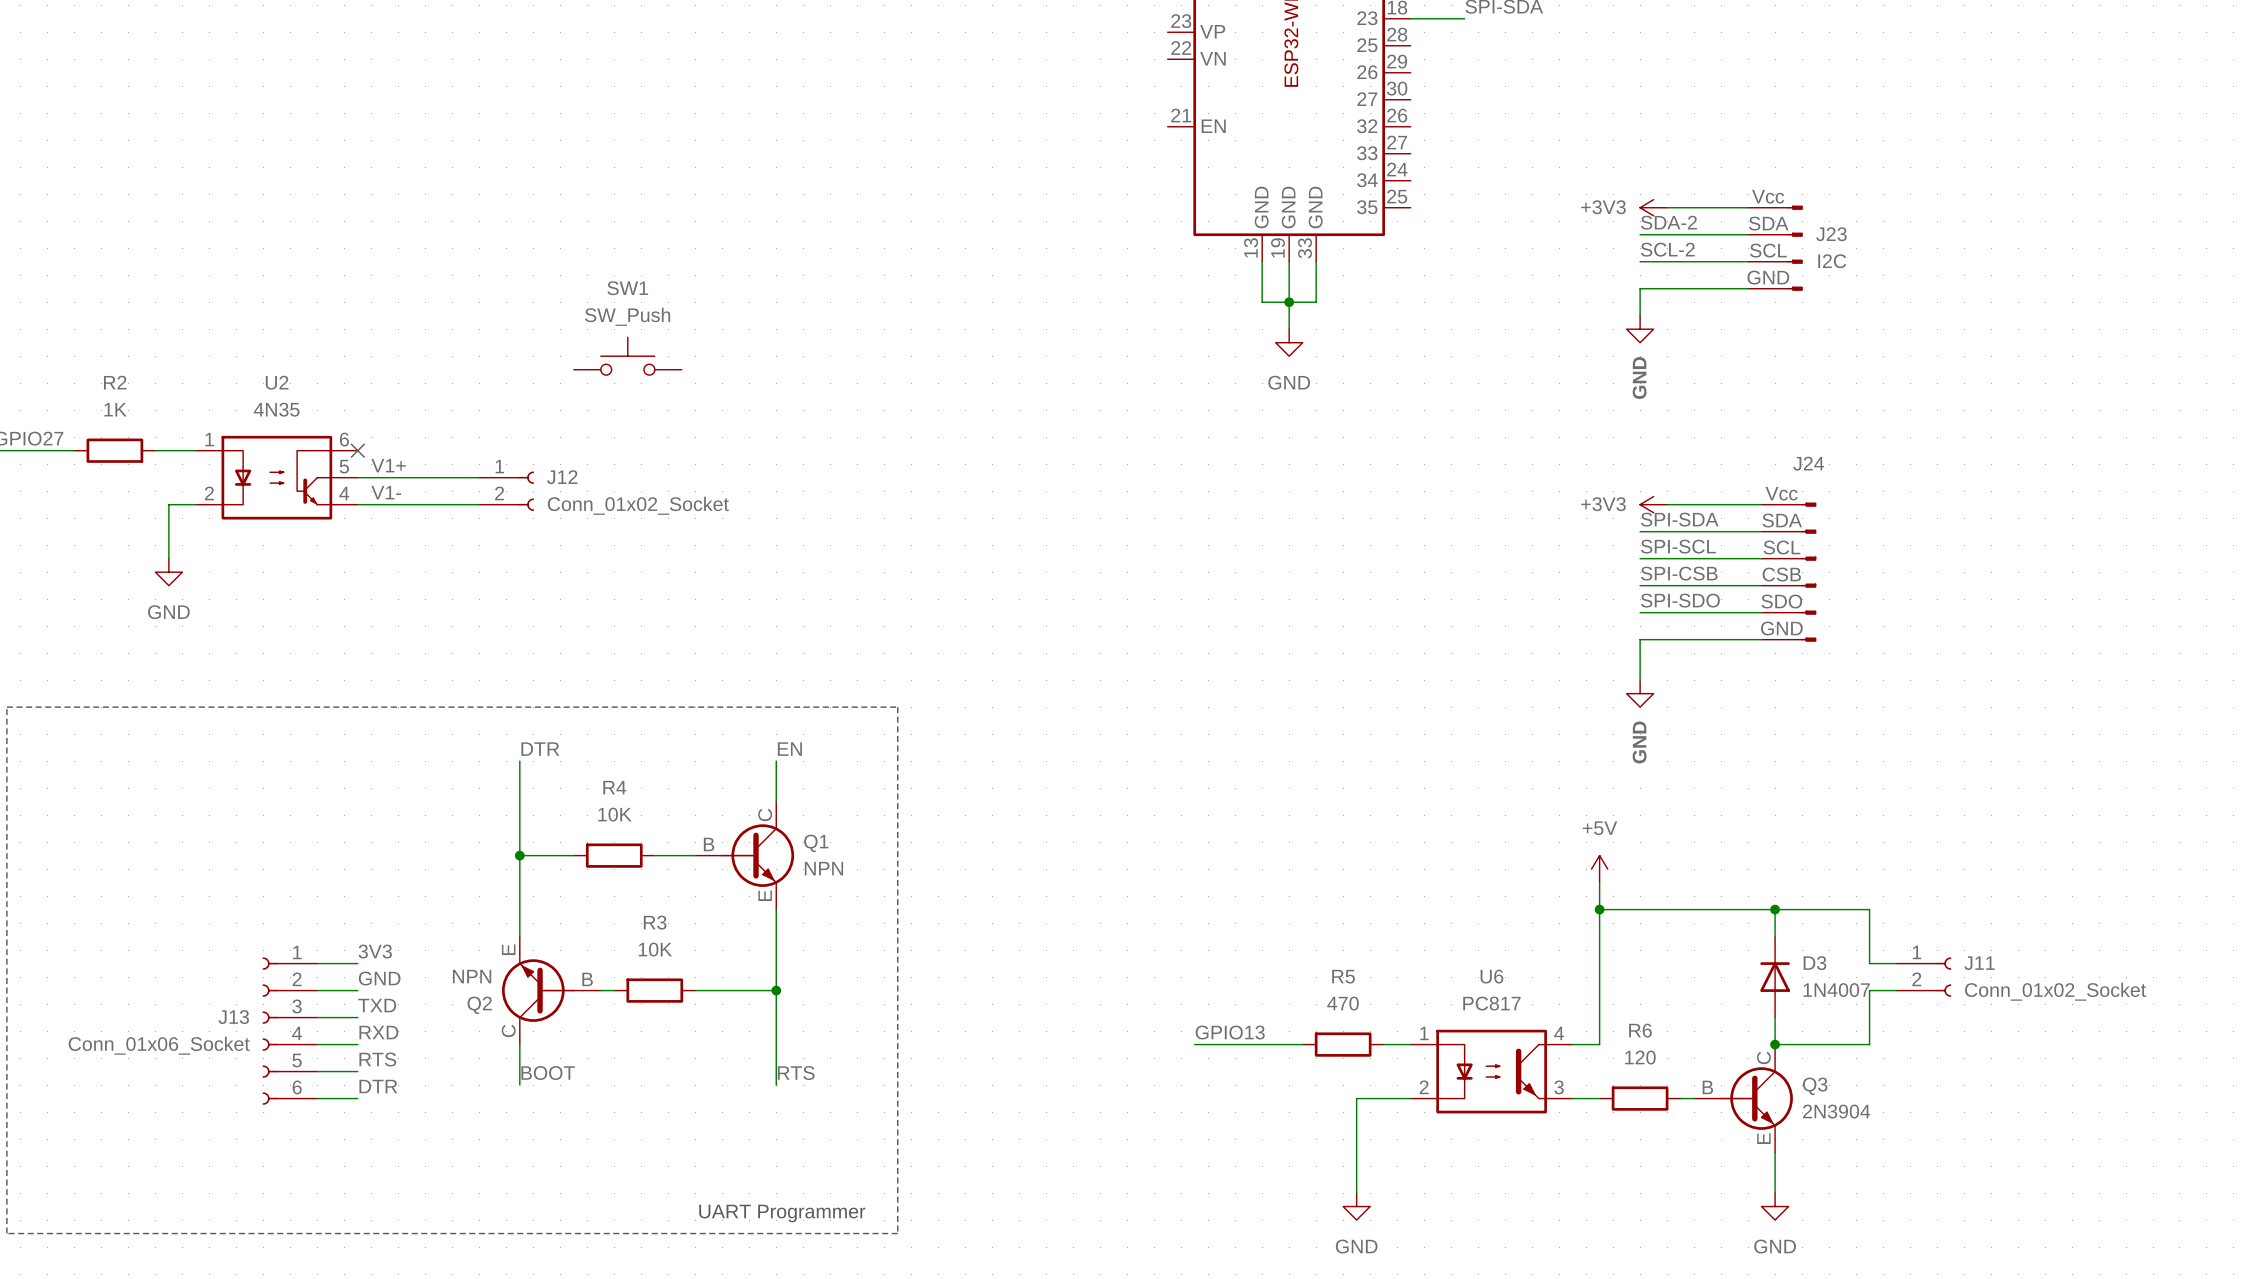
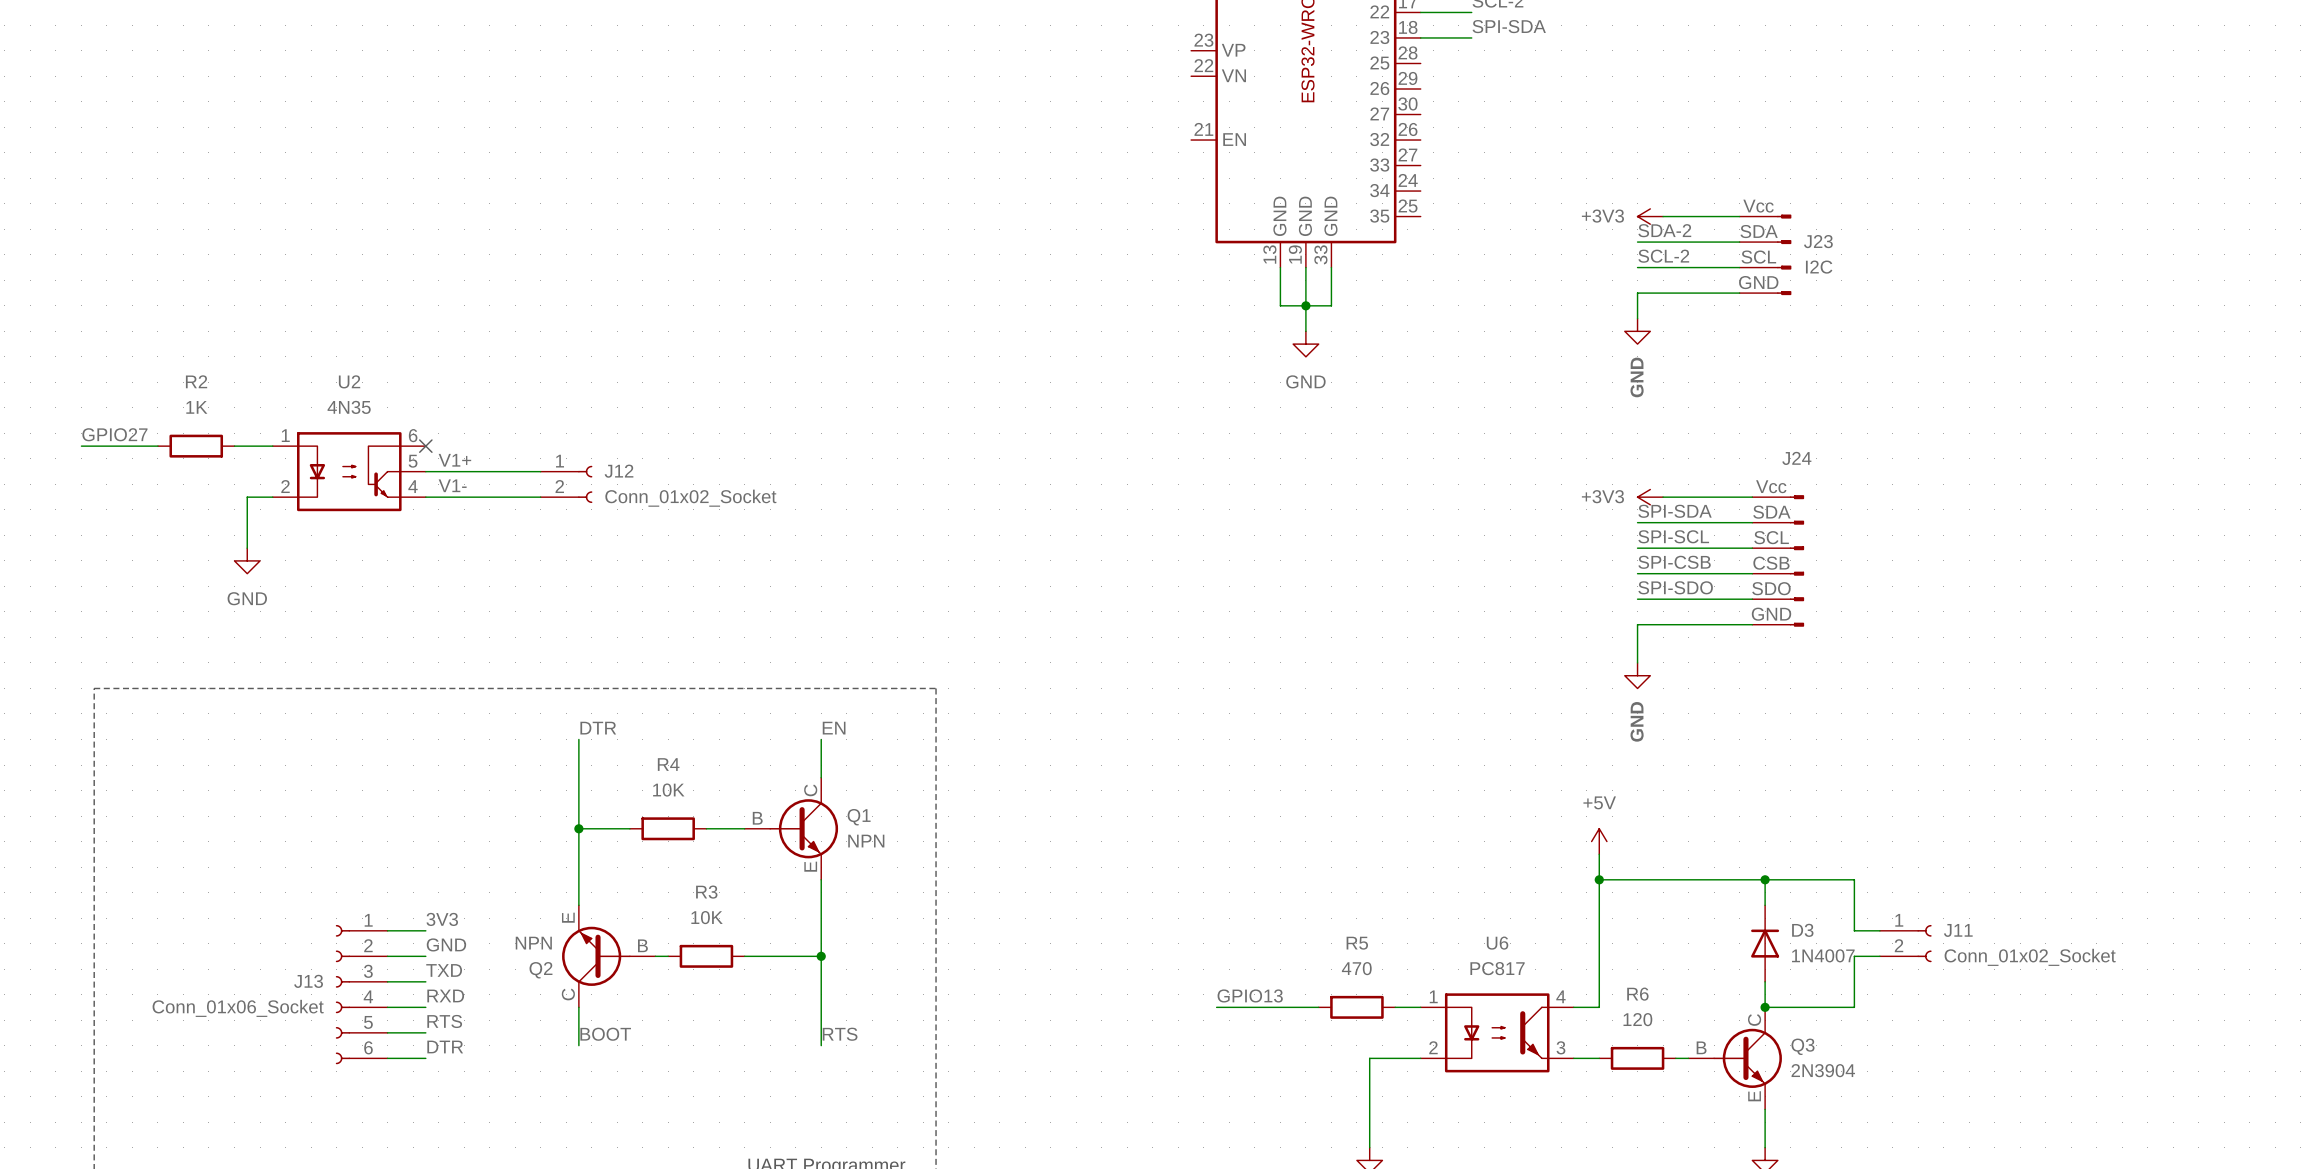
SW1: SW_Push (627, 356) -> none

